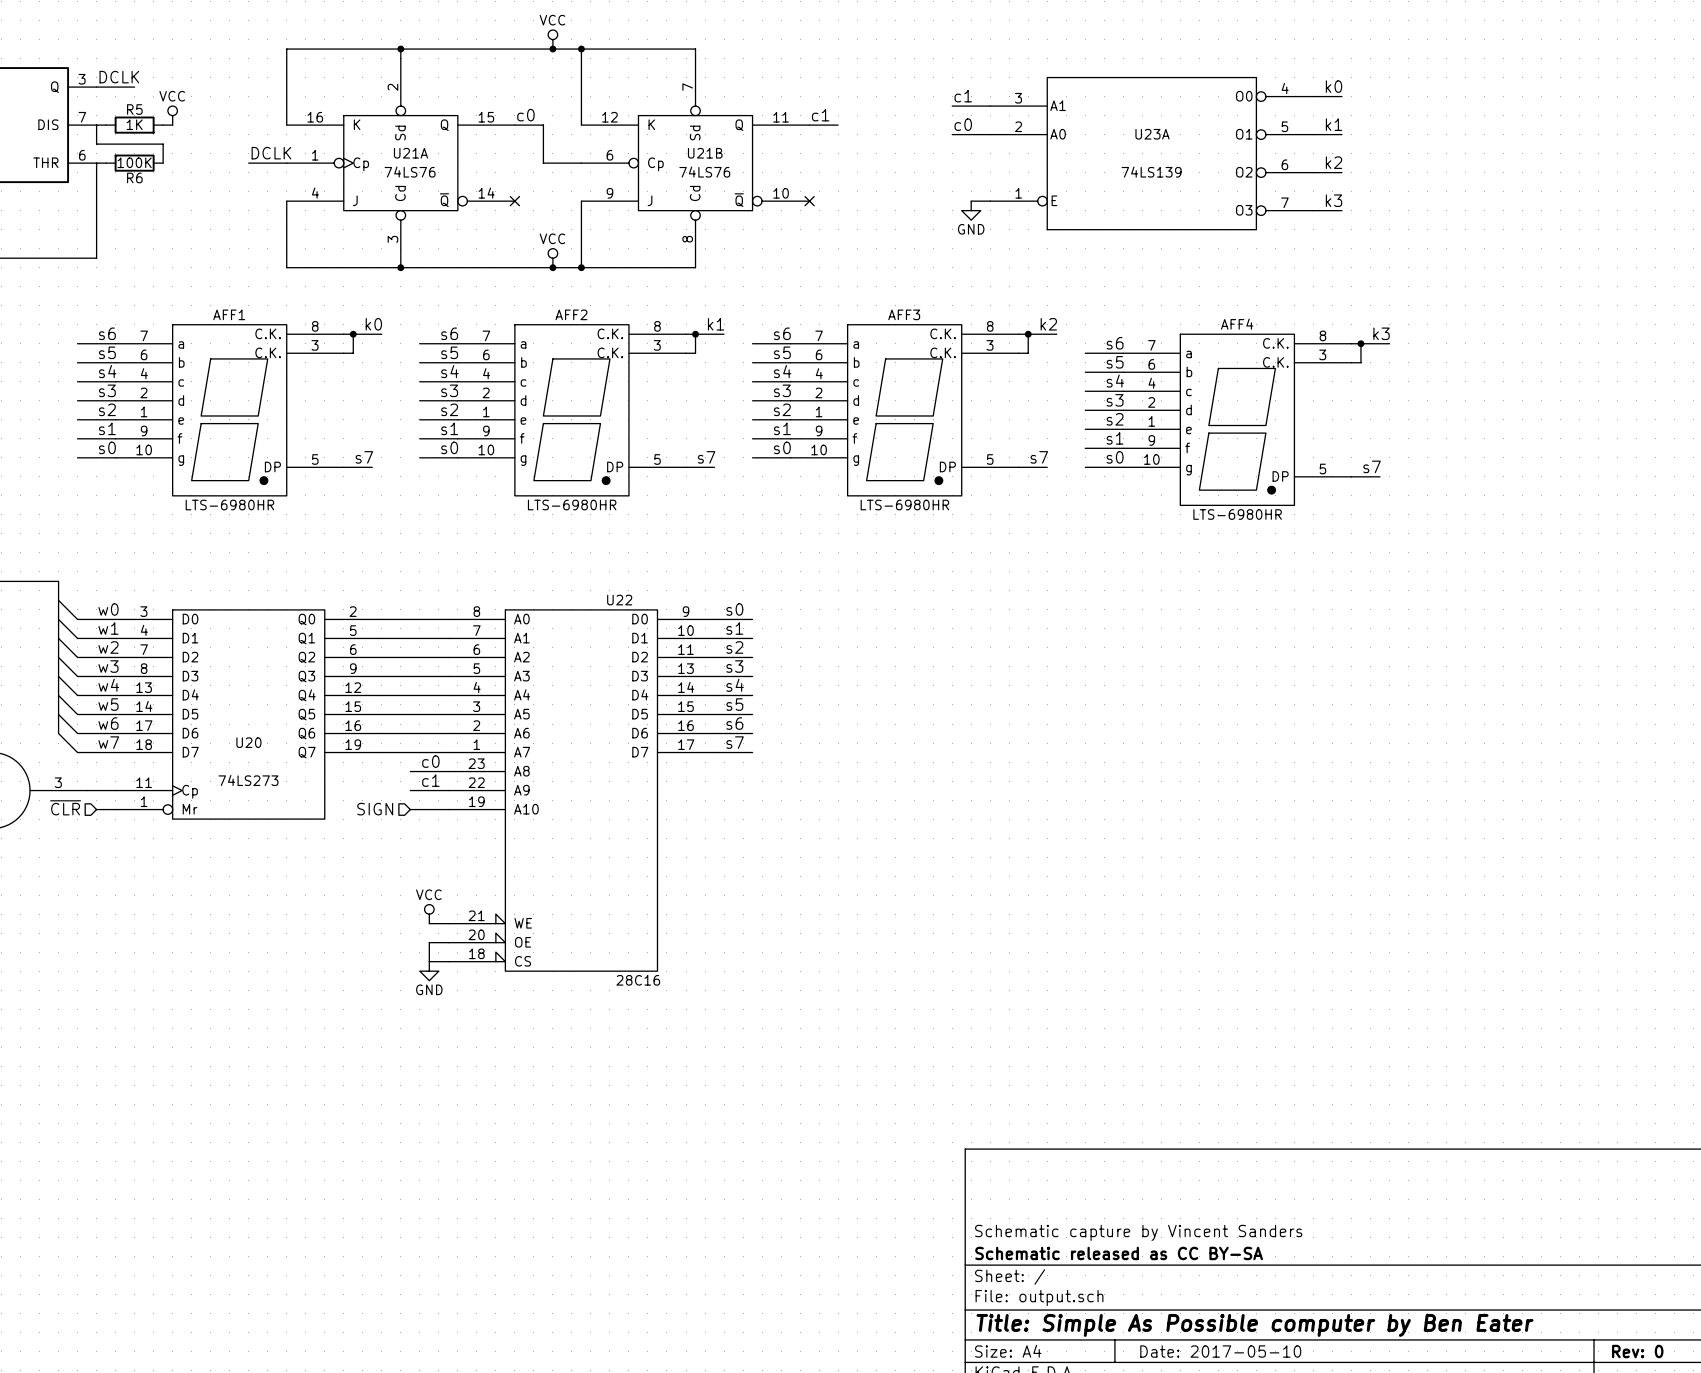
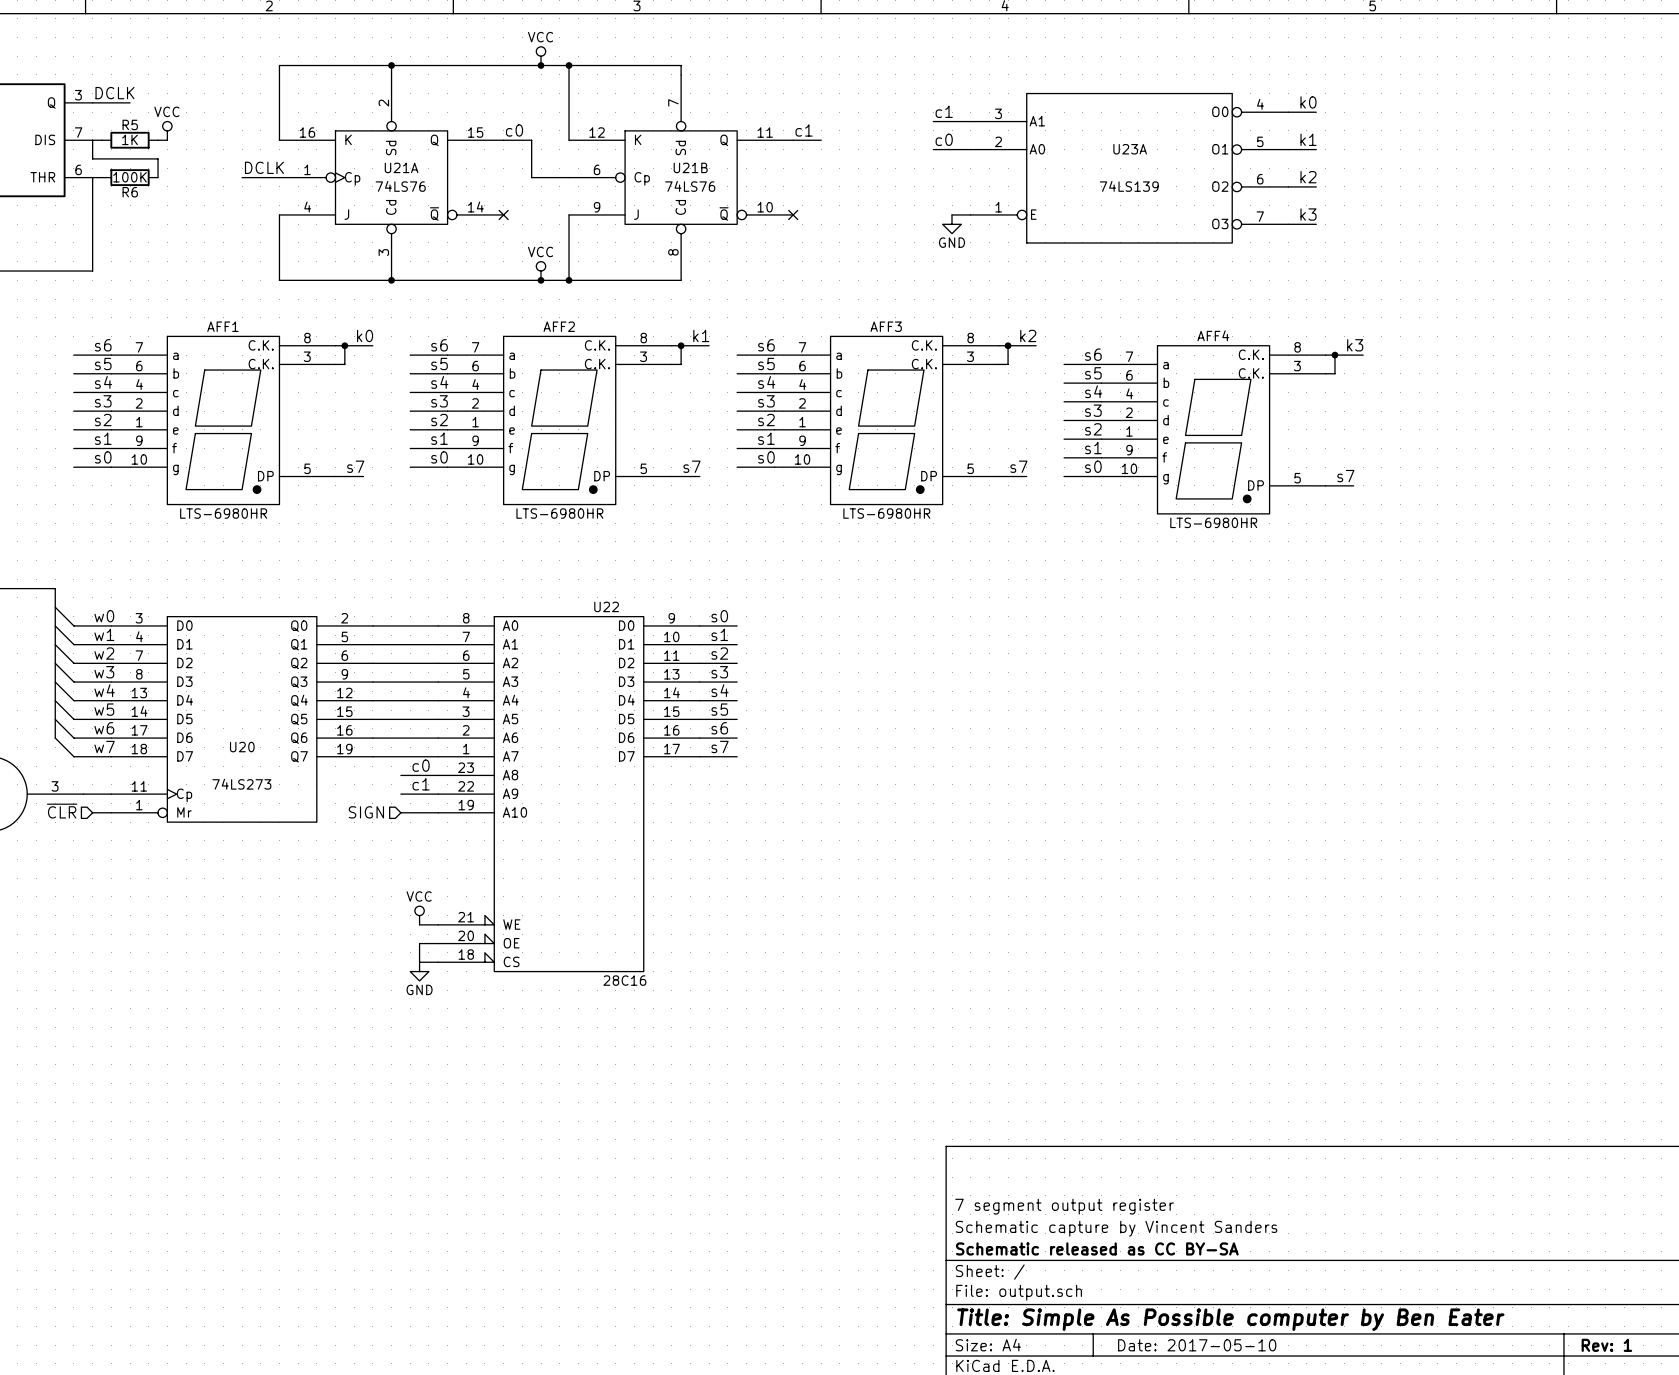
title block: none -> 7 segment output register (1064, 1206)
title block: Rev: 0 (1637, 1351) -> Rev: 1 (1606, 1345)

